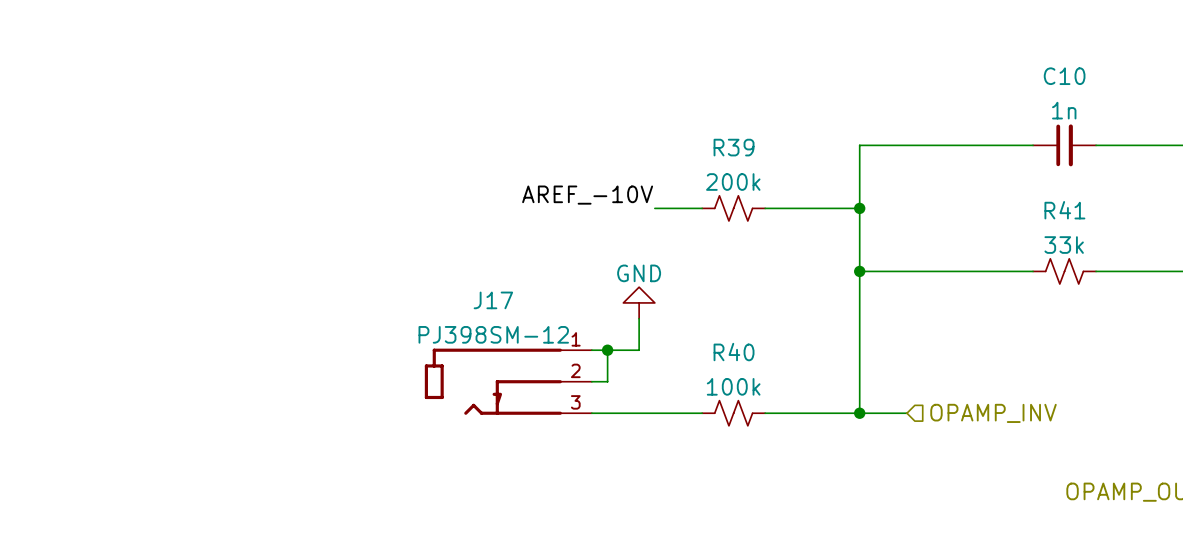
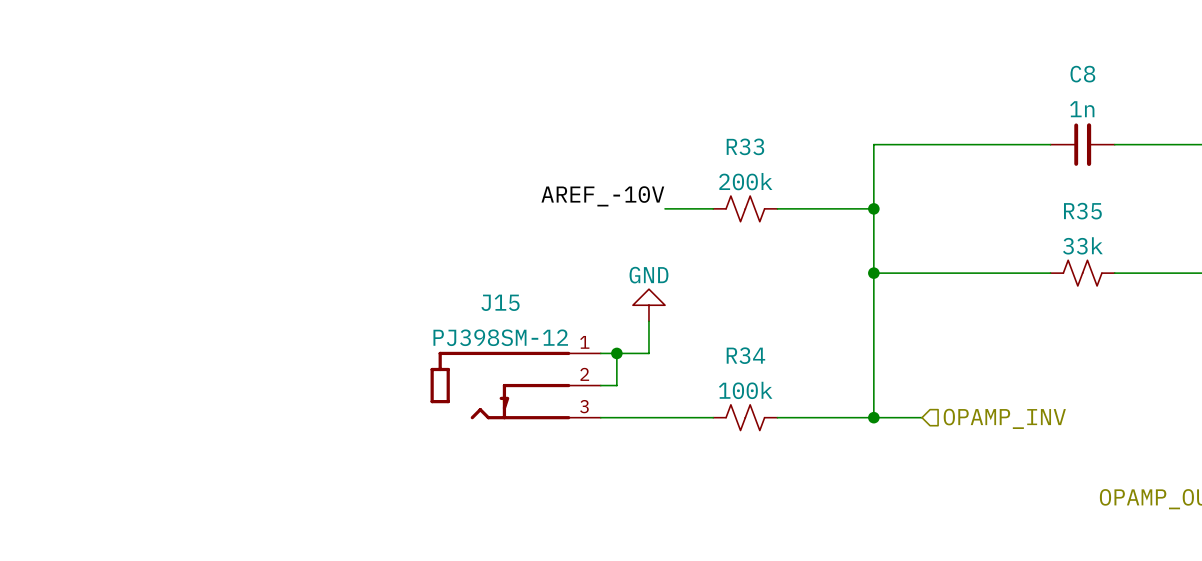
C10 name: C10 (1064, 76) -> C8 (1082, 74)
R39 name: R39 (734, 147) -> R33 (745, 146)
R41 name: R41 (1064, 210) -> R35 (1082, 211)
J17 name: J17 (493, 300) -> J15 (500, 302)
R40 name: R40 (734, 352) -> R34 (745, 355)

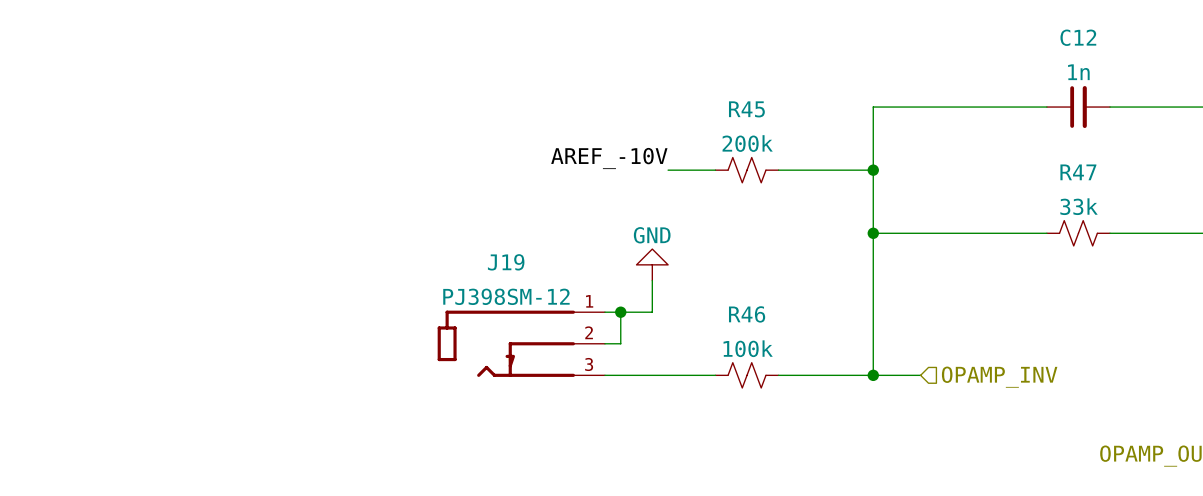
C8 name: C8 (1082, 74) -> C12 (1078, 37)
R33 name: R33 (745, 146) -> R45 (746, 109)
R35 name: R35 (1082, 211) -> R47 (1078, 172)
J15 name: J15 (500, 302) -> J19 (506, 262)
R34 name: R34 (745, 355) -> R46 (747, 314)

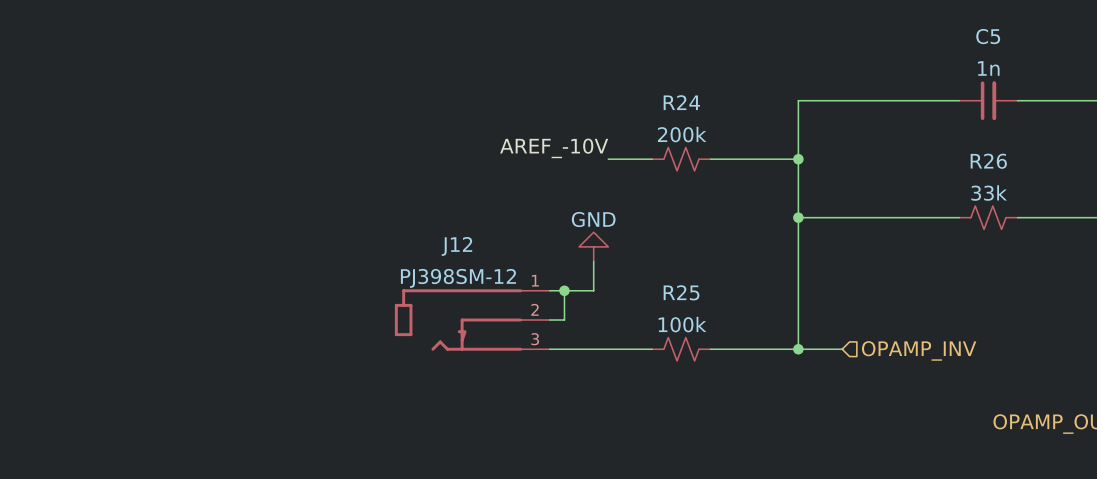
C12 name: C12 (1078, 37) -> C5 (988, 36)
R45 name: R45 (746, 109) -> R24 (681, 102)
R47 name: R47 (1078, 172) -> R26 (988, 161)
J19 name: J19 (506, 262) -> J12 (456, 246)
R46 name: R46 (747, 314) -> R25 (681, 292)

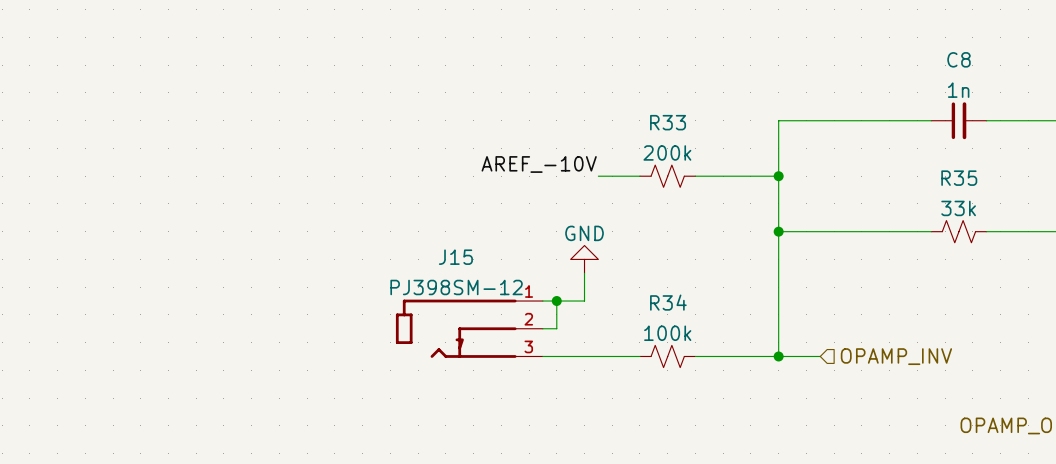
C5 name: C5 (988, 36) -> C8 (959, 59)
R24 name: R24 (681, 102) -> R33 (668, 122)
R26 name: R26 (988, 161) -> R35 (959, 178)
J12 name: J12 (456, 246) -> J15 (455, 257)
R25 name: R25 (681, 292) -> R34 (668, 302)

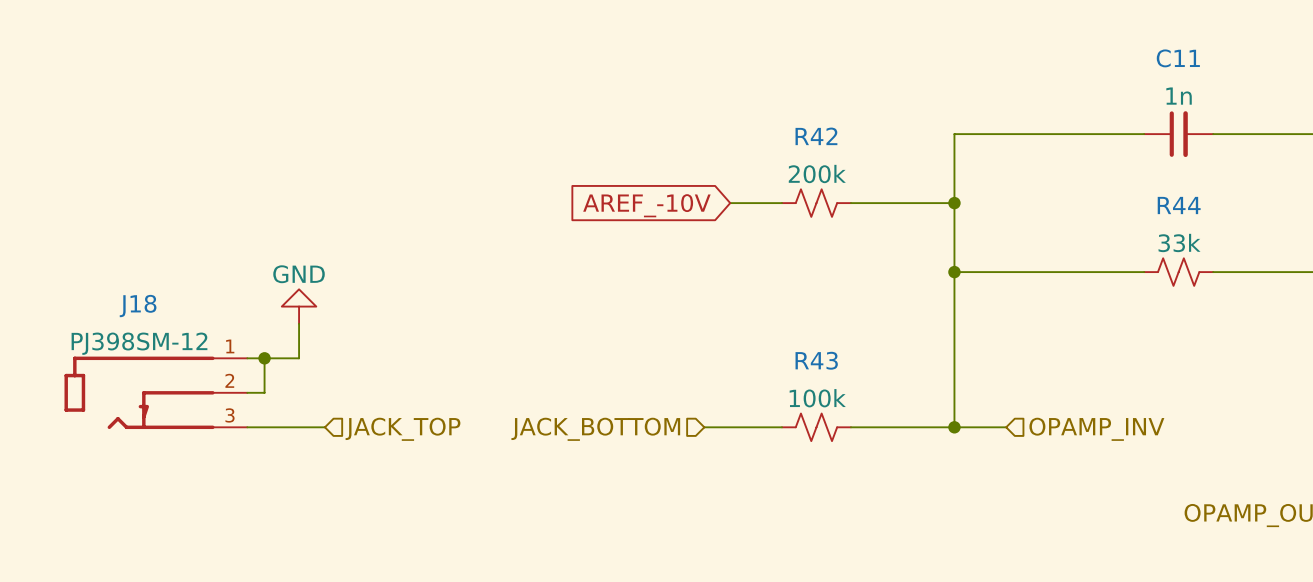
C8 name: C8 (959, 59) -> C11 (1178, 58)
R33 name: R33 (668, 122) -> R42 (816, 136)
label: AREF_-10V (539, 164) -> none
global label: none -> AREF_-10V (646, 205)
R35 name: R35 (959, 178) -> R44 (1179, 205)
power symbol: none -> GND (299, 306)
power symbol: GND (584, 259) -> none
wire: none -> (299, 323) (299, 358) (247, 358)
wire: (584, 273) (584, 301) (542, 301) -> none
wire: none -> (264, 358) (264, 392) (247, 392)
junction: none -> (264, 358)
wire: (556, 301) (556, 328) (542, 328) -> none
junction: (556, 301) -> none
R34 name: R34 (668, 302) -> R43 (816, 360)
J18: none -> PJ398SM-12 (155, 392)
J15: PJ398SM-12 (469, 328) -> none
wire: none -> (247, 427) (324, 427)
hierarchical label: none -> JACK_TOP (402, 429)
hierarchical label: none -> JACK_BOTTOM (595, 429)
wire: (542, 356) (577, 356) -> none

